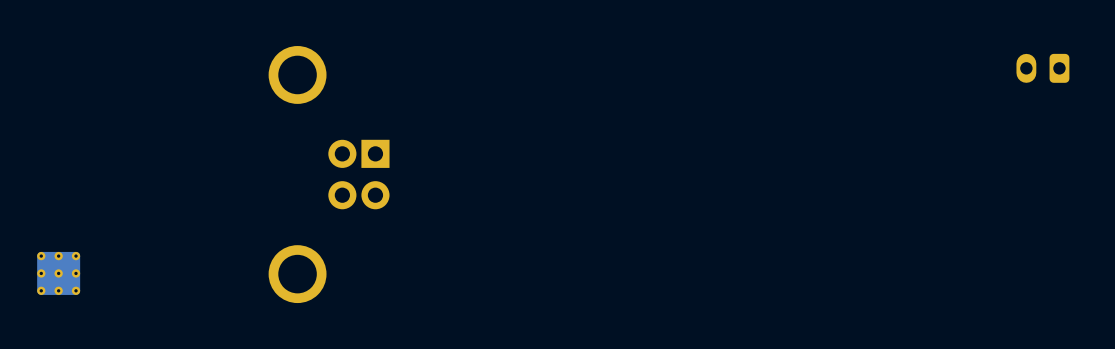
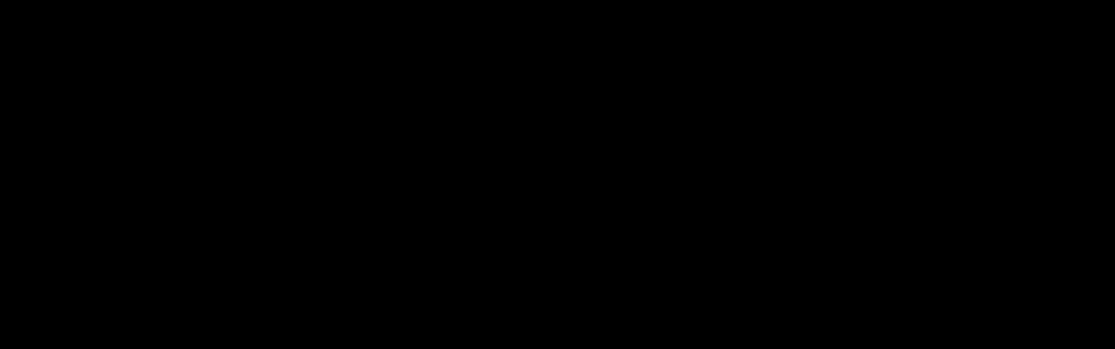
part: (1042, 68) -> none
part: (329, 174) -> none
part: (58, 273) -> none

